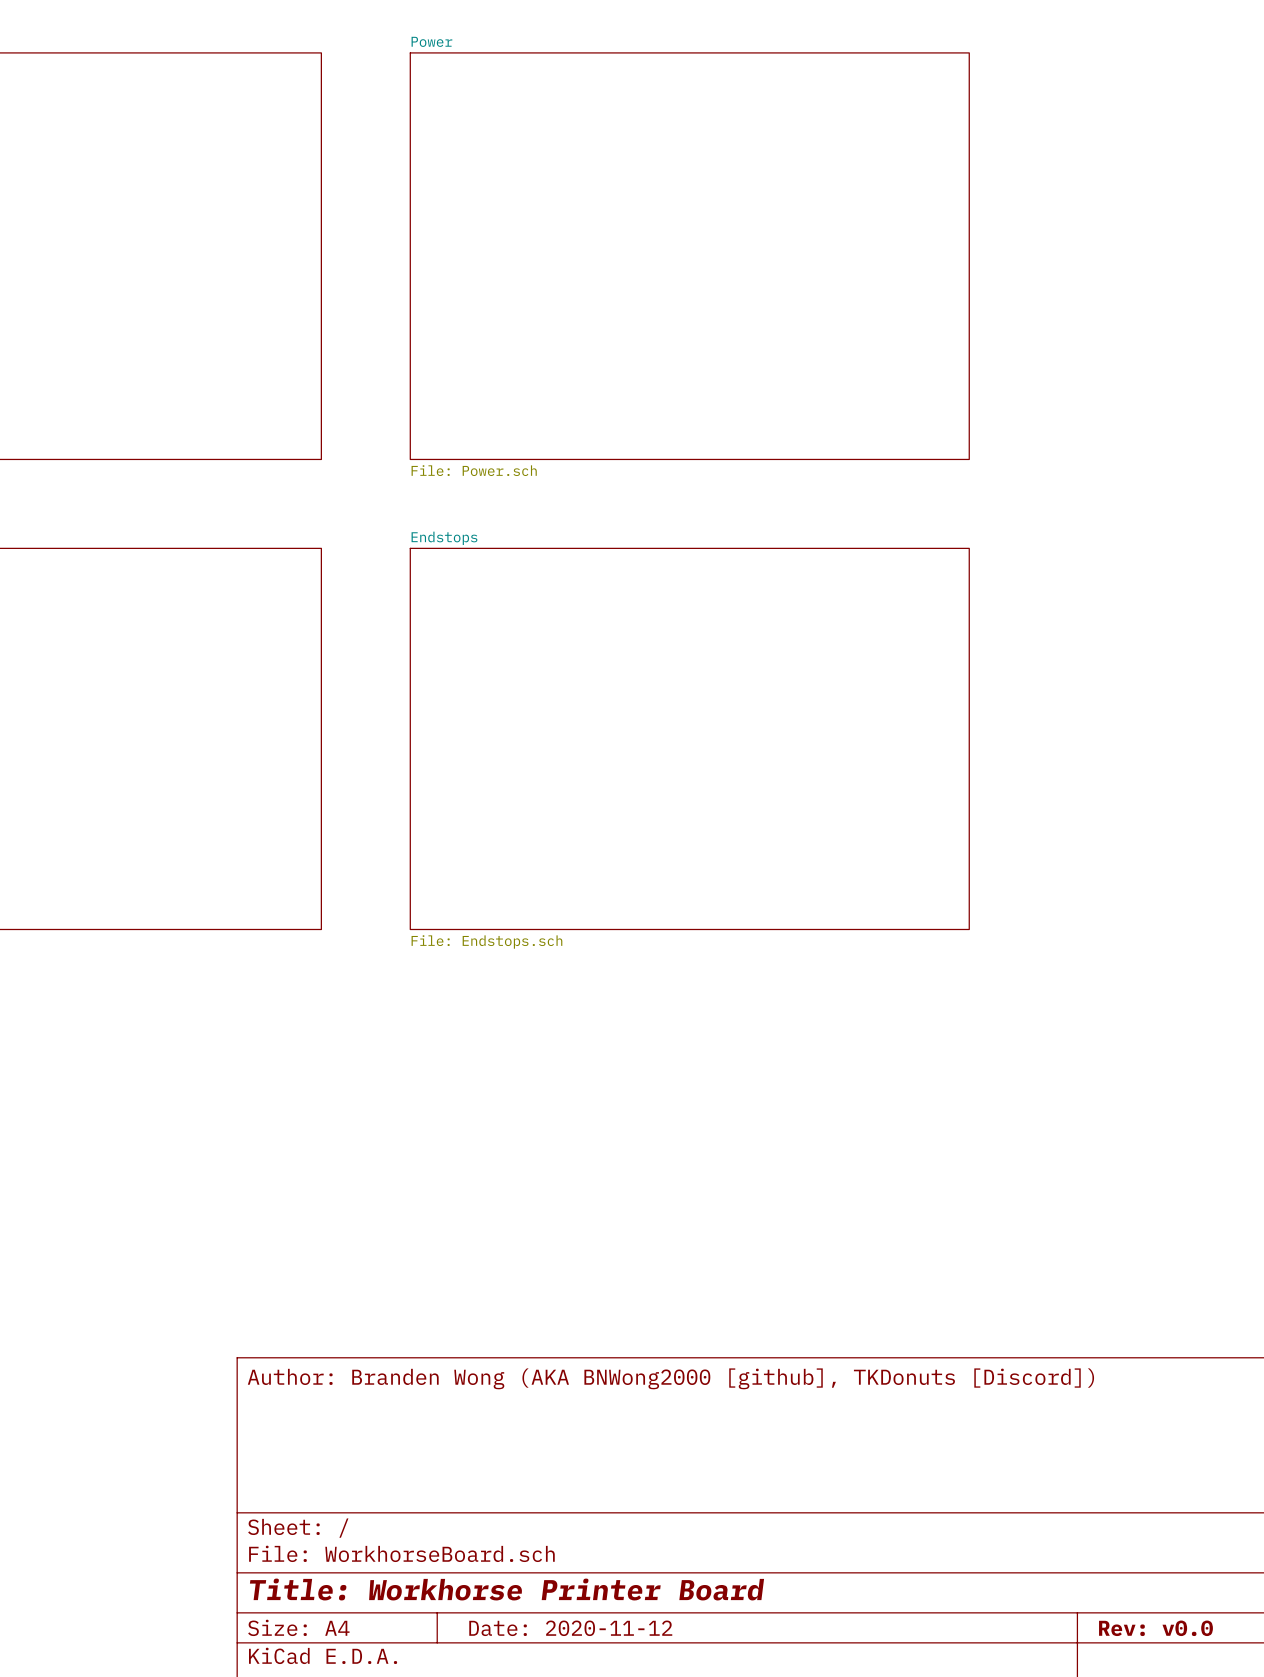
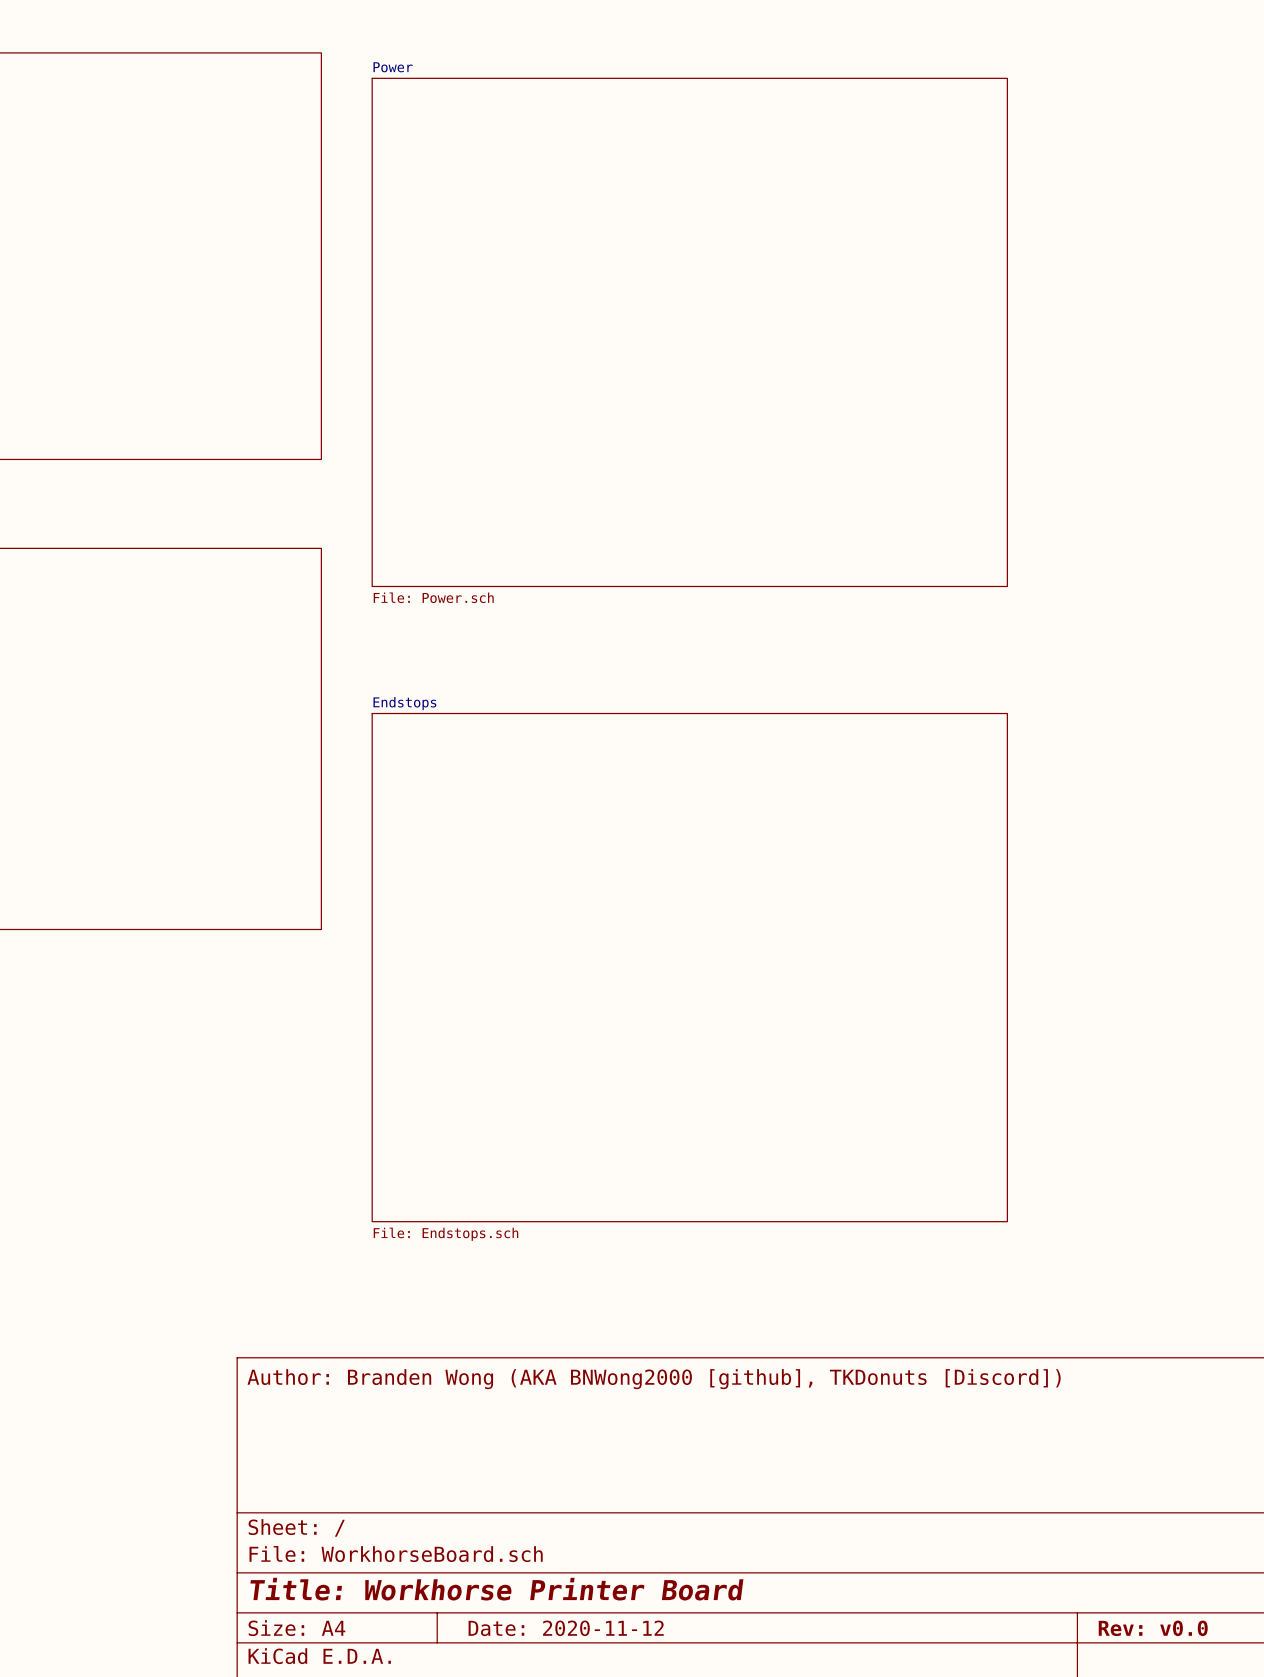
sheet Power: File: Power.sch (689, 256) -> none
sheet Power: none -> File: Power.sch (689, 332)
sheet Endstops: File: Endstops.sch (689, 738) -> none
sheet Endstops: none -> File: Endstops.sch (689, 967)

